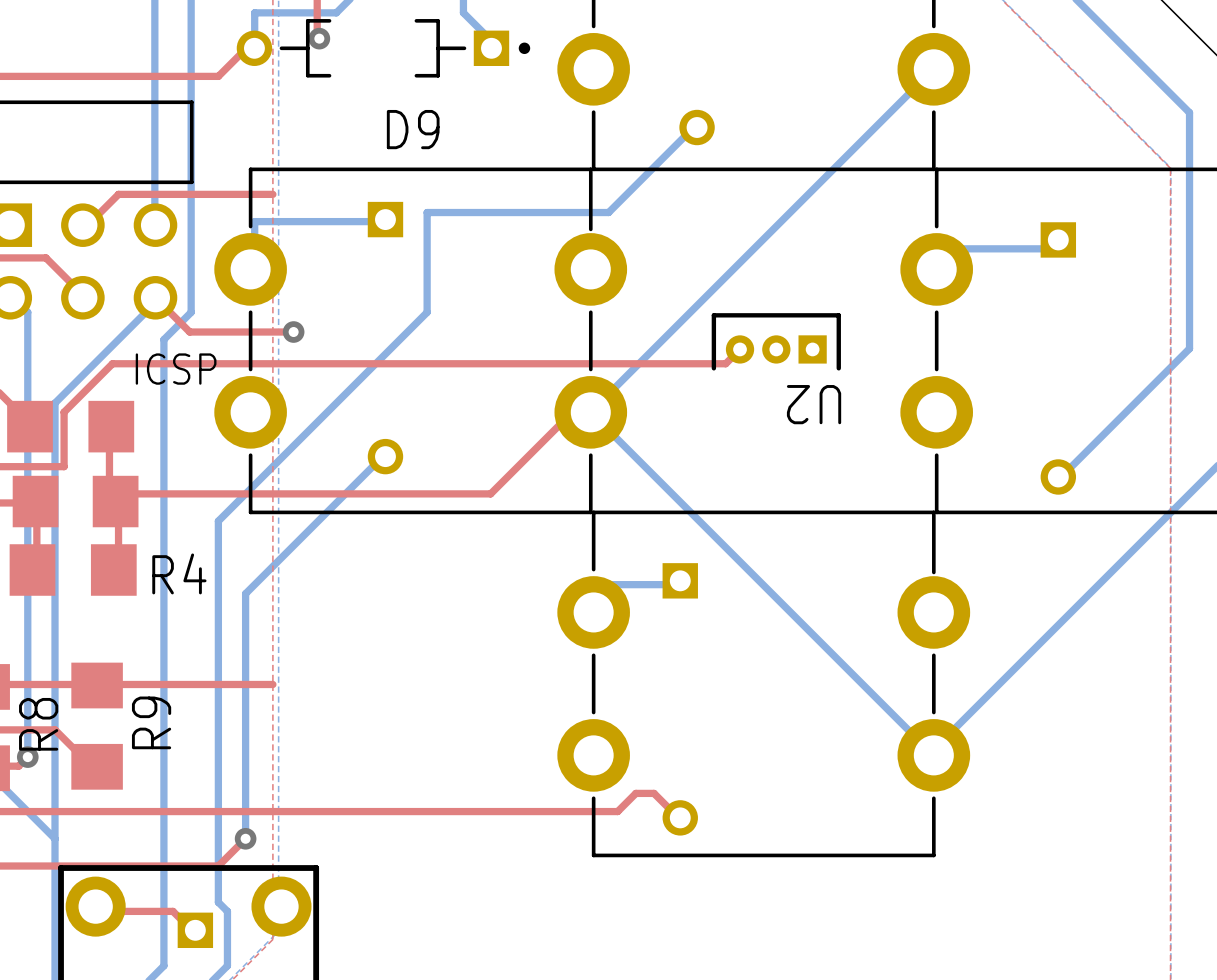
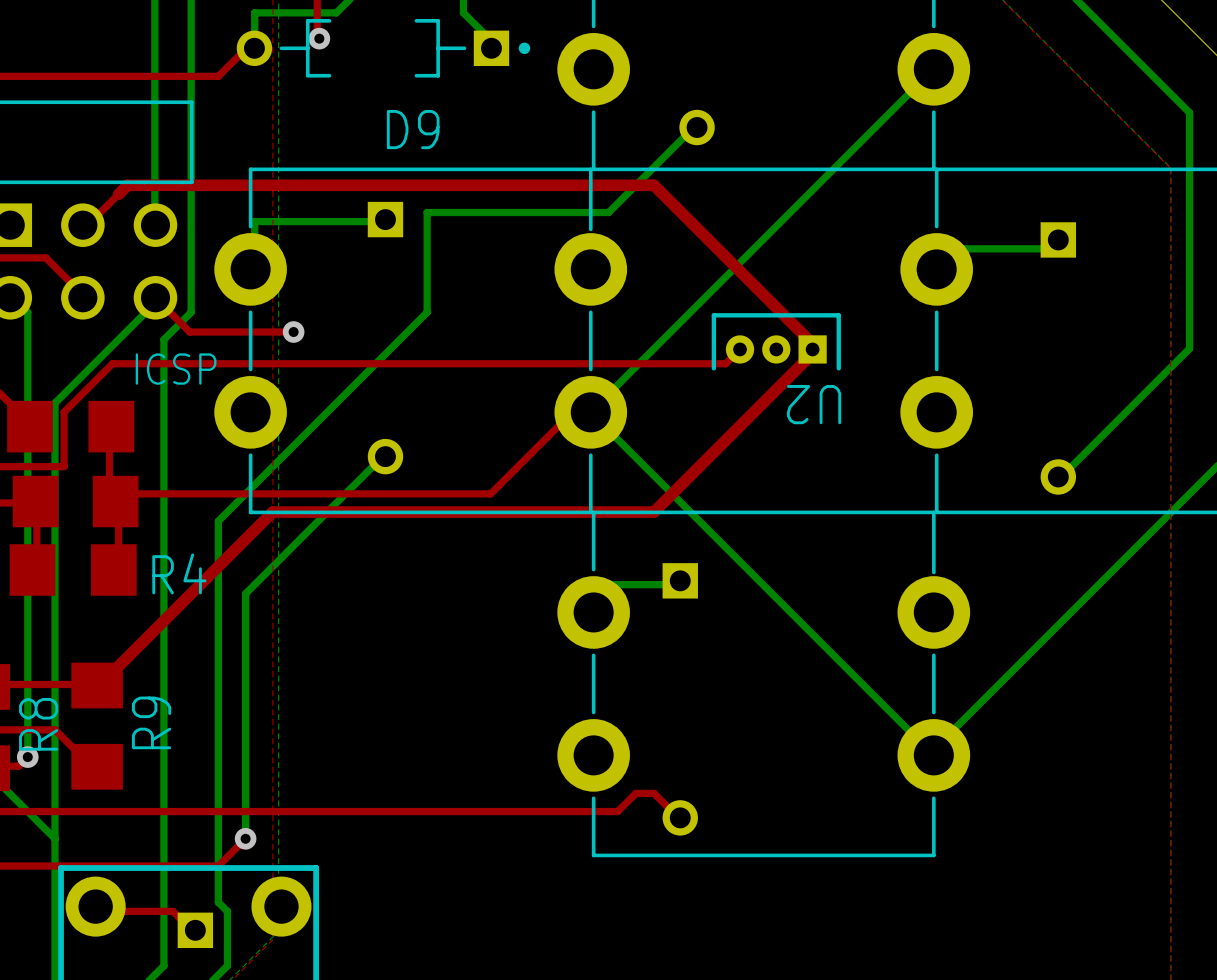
top track: (118, 194) (272, 194) -> none
top track: (100, 684) (272, 684) -> (100, 684) (272, 512) (654, 512) (808, 357) (812, 349) (817, 348) (654, 185) (127, 185) (118, 194)

